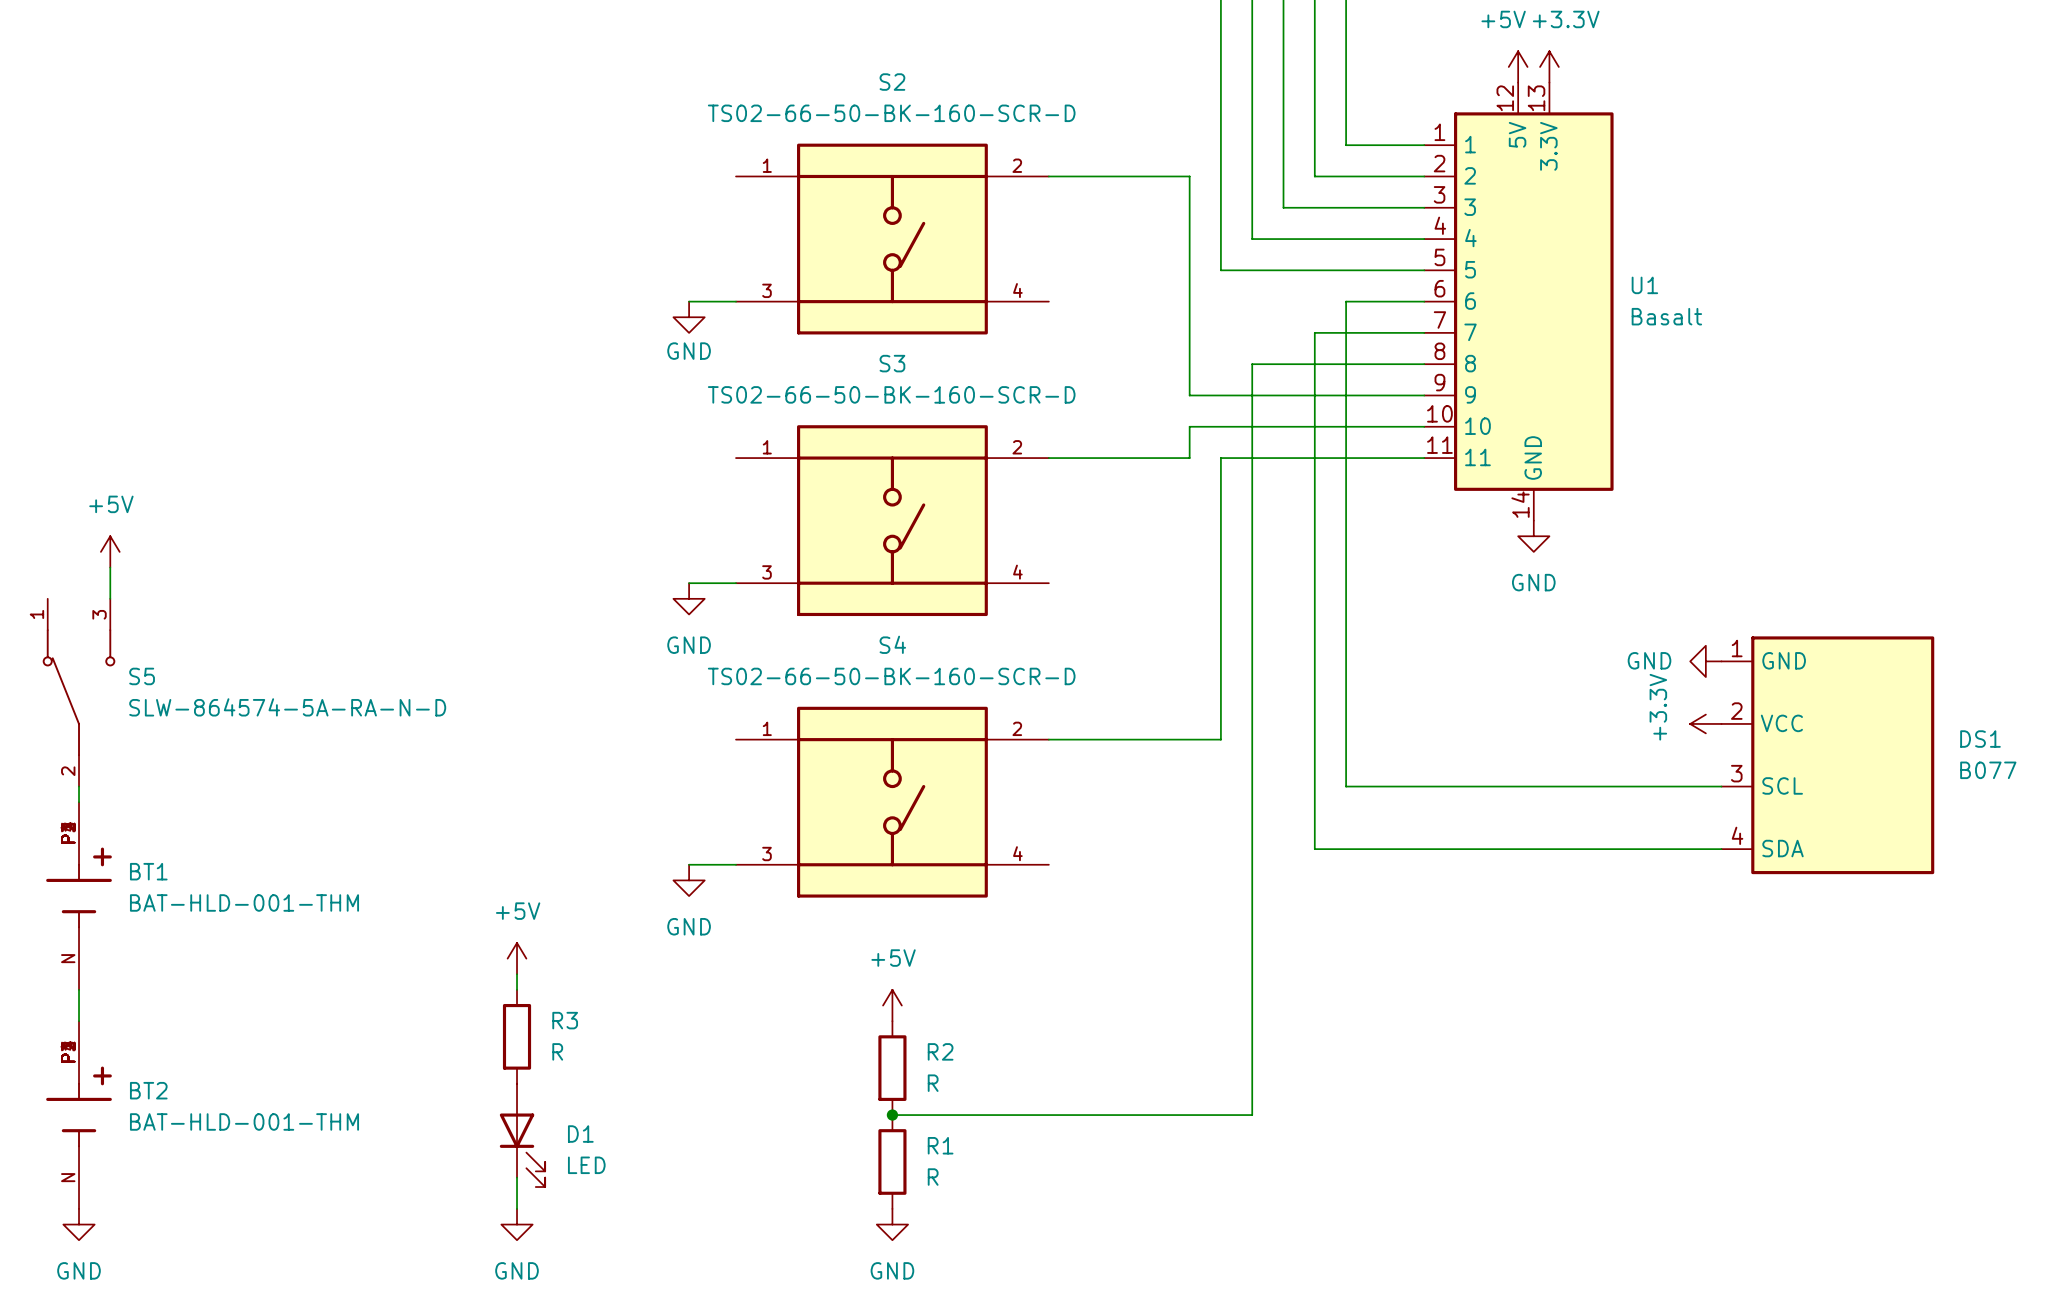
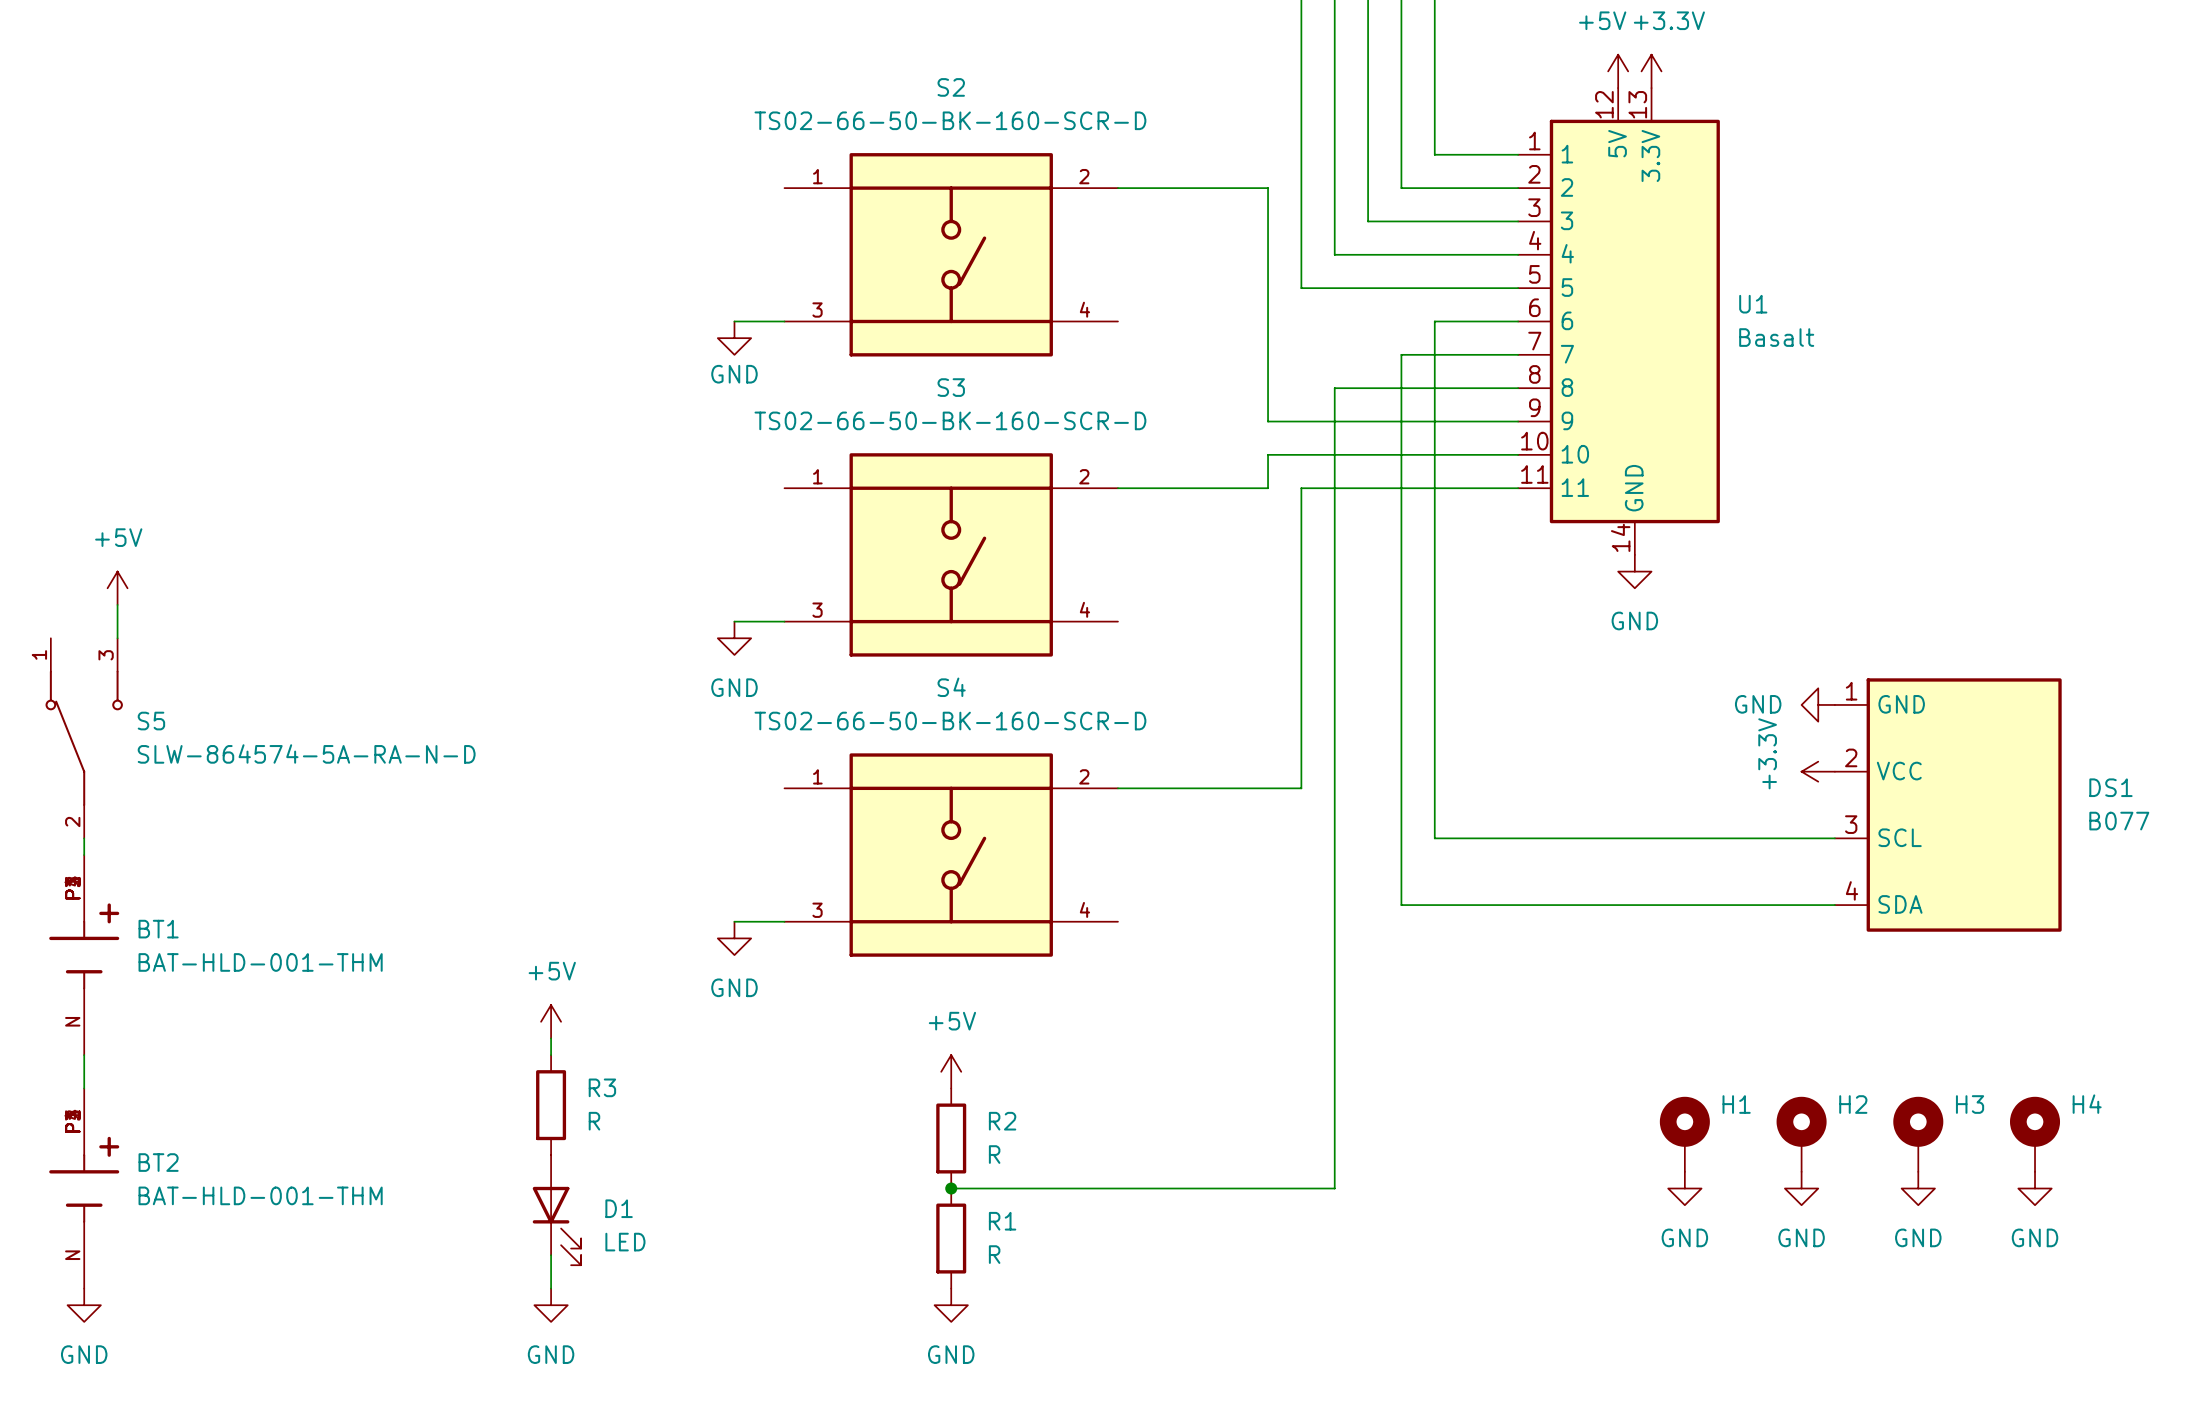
H1: none -> (1684, 1134)
H2: none -> (1801, 1134)
H3: none -> (1918, 1134)
H4: none -> (2035, 1134)
power symbol: none -> GND (1684, 1188)
power symbol: none -> GND (1801, 1188)
power symbol: none -> GND (1918, 1188)
power symbol: none -> GND (2035, 1188)

